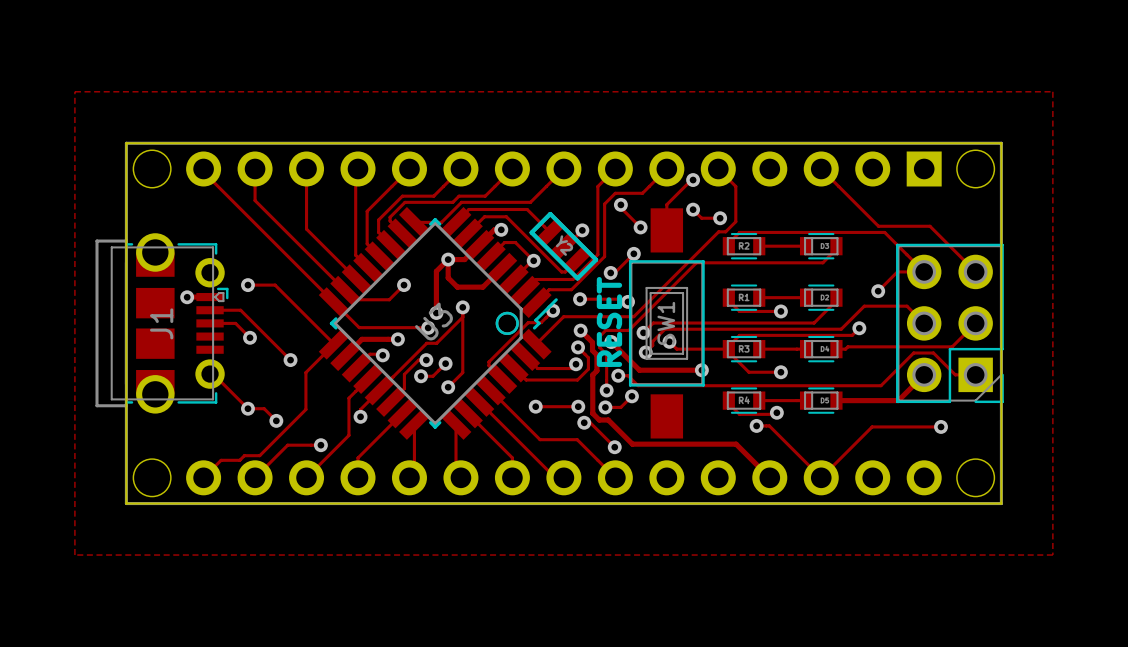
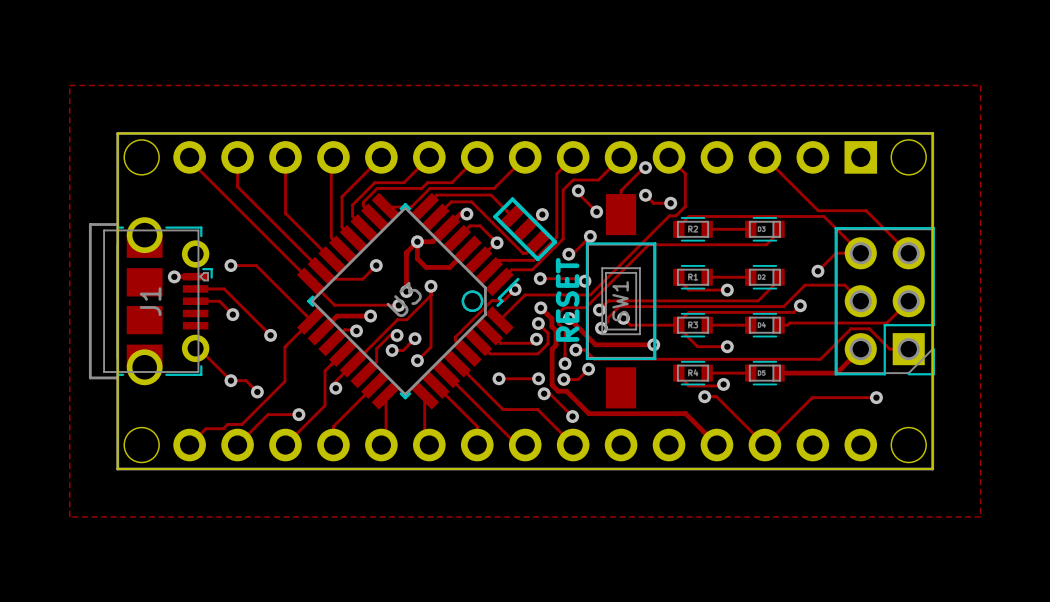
Y2: (563, 246) -> none
part: none -> (525, 229)
part rotation: 0° (821, 246) -> 180° (764, 229)
part rotation: 0° (821, 297) -> 180° (764, 277)
part rotation: 0° (821, 349) -> 180° (764, 325)
part rotation: 0° (821, 400) -> 180° (764, 373)

